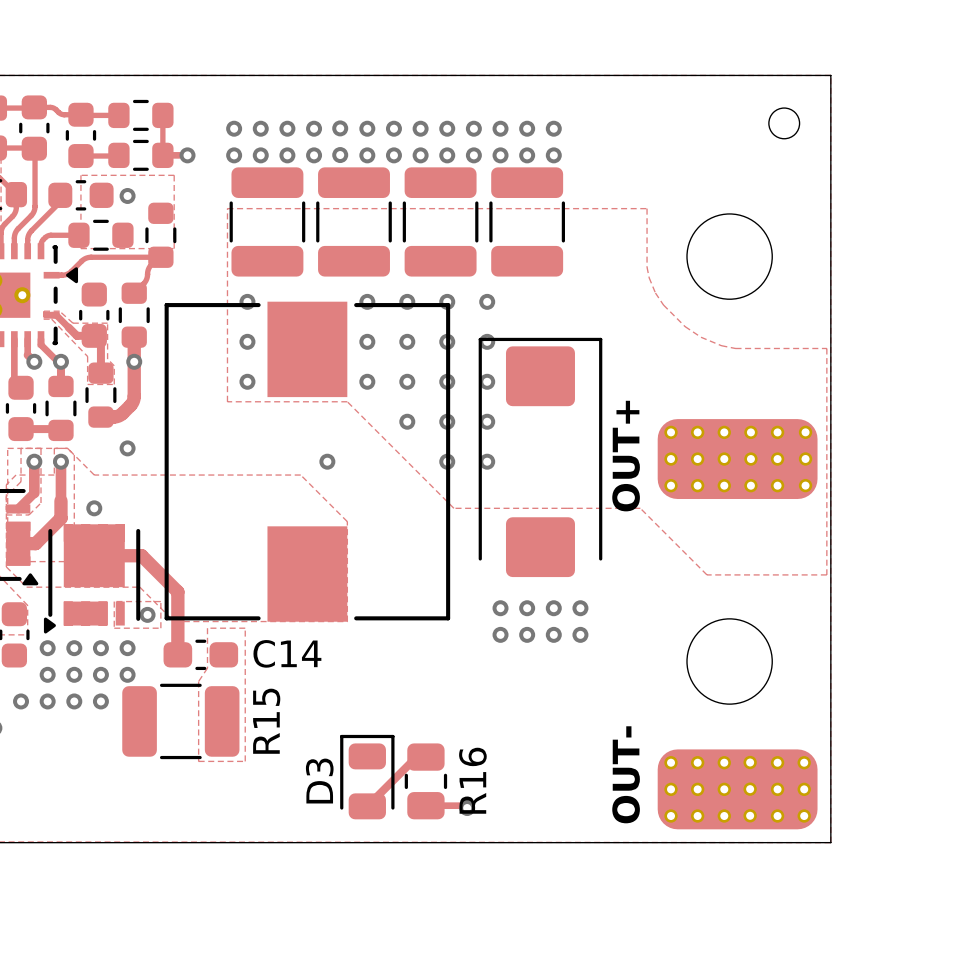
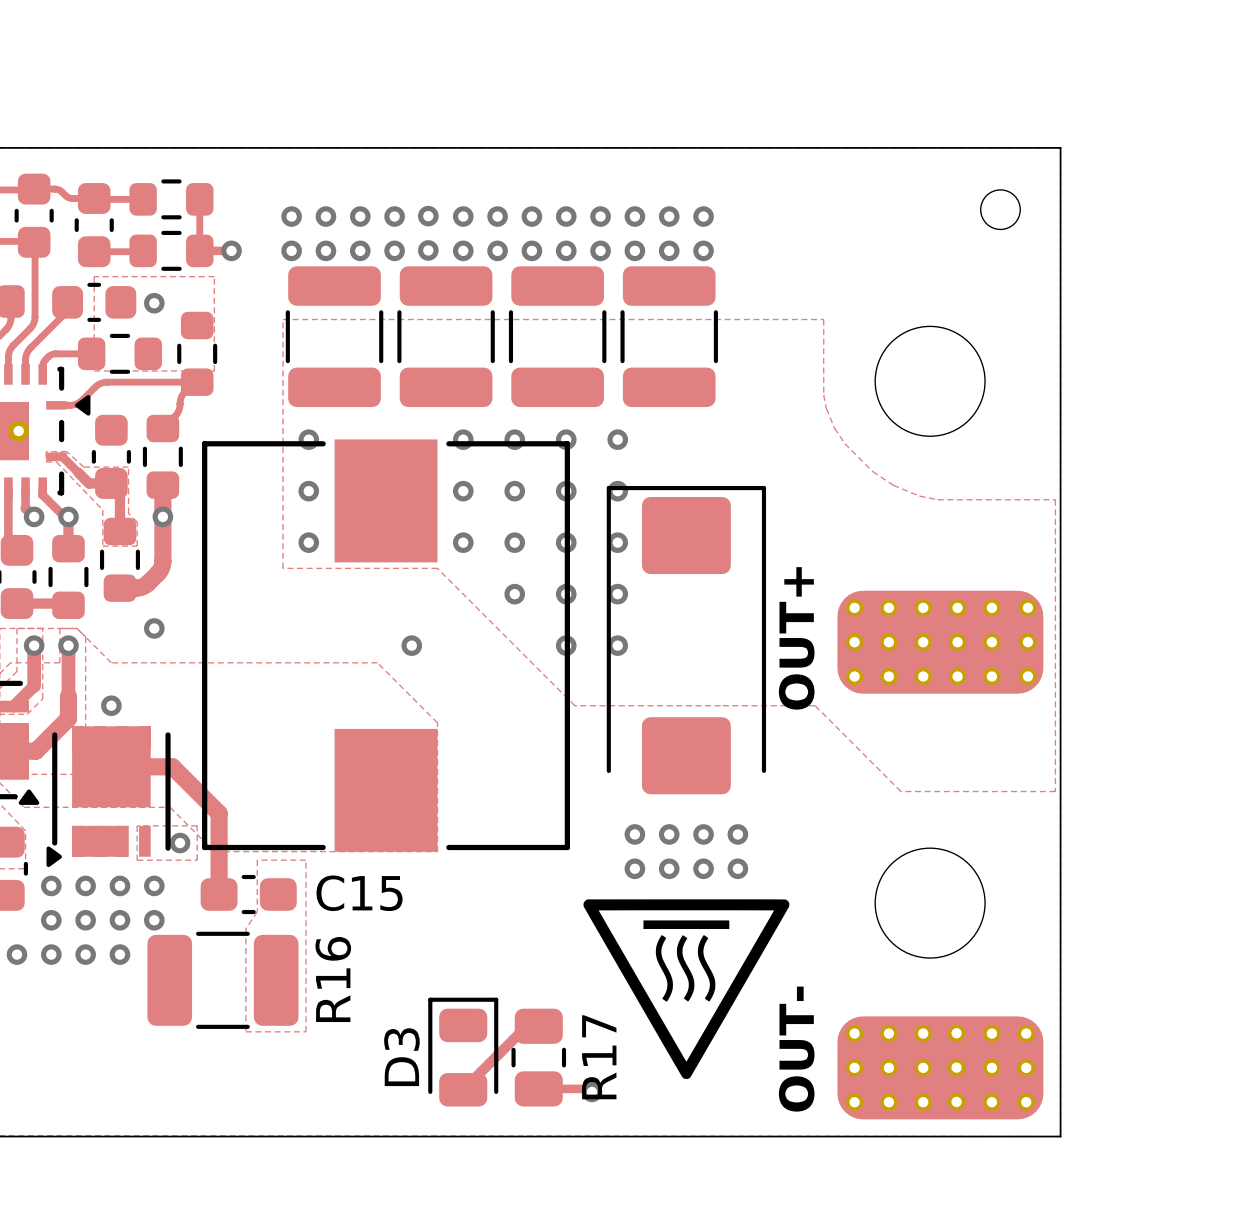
C14 name: C14 (287, 653) -> C15 (359, 893)
drawing: none -> [583, 899, 790, 1079]
R15 name: R15 (266, 721) -> R16 (333, 979)
R16 name: R16 (472, 780) -> R17 (599, 1057)

